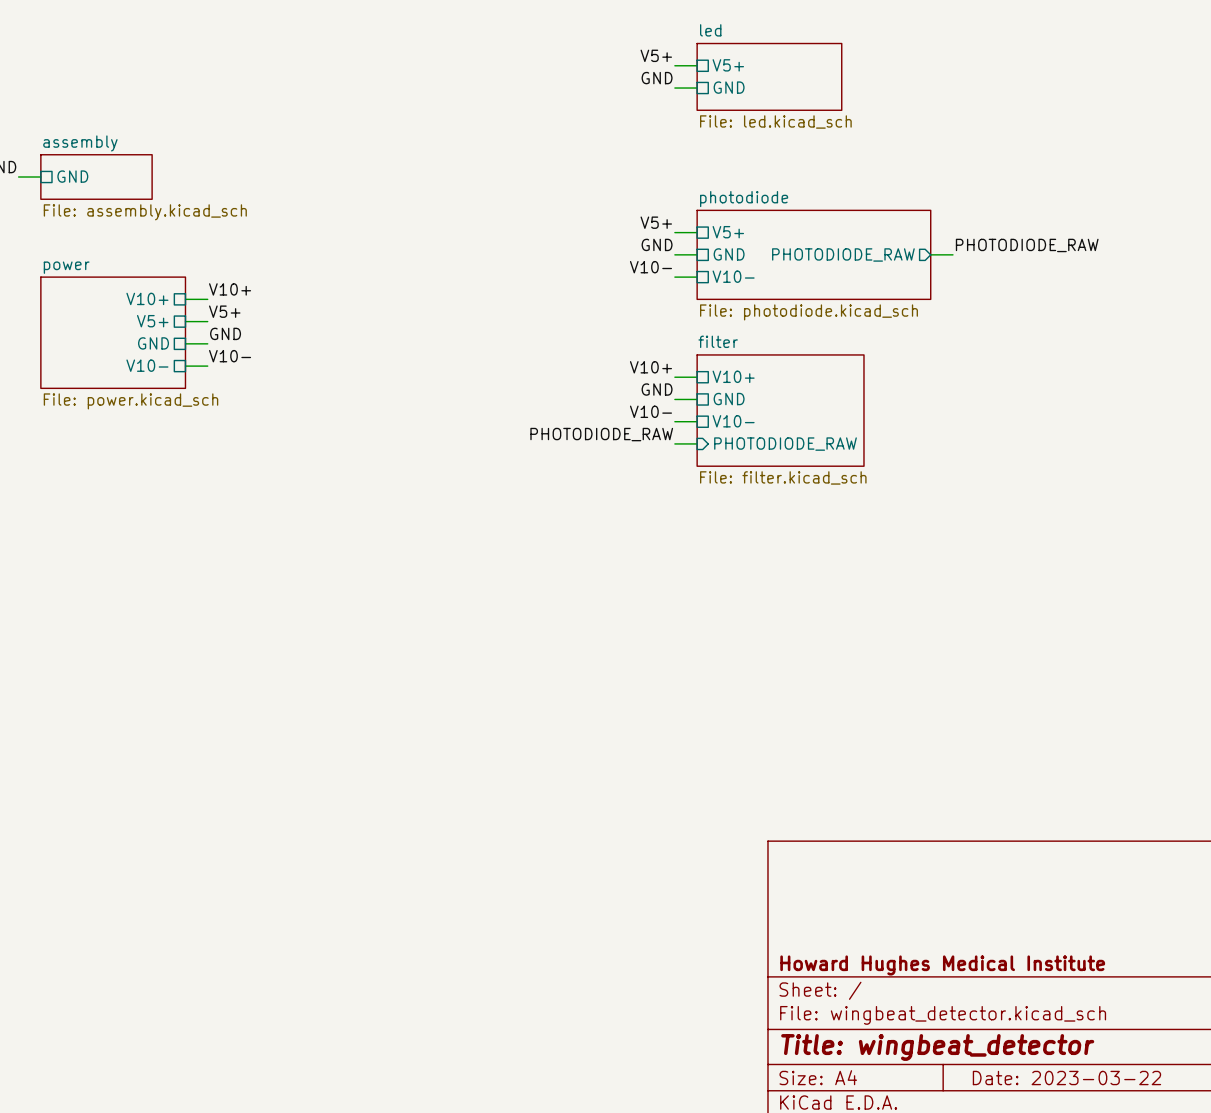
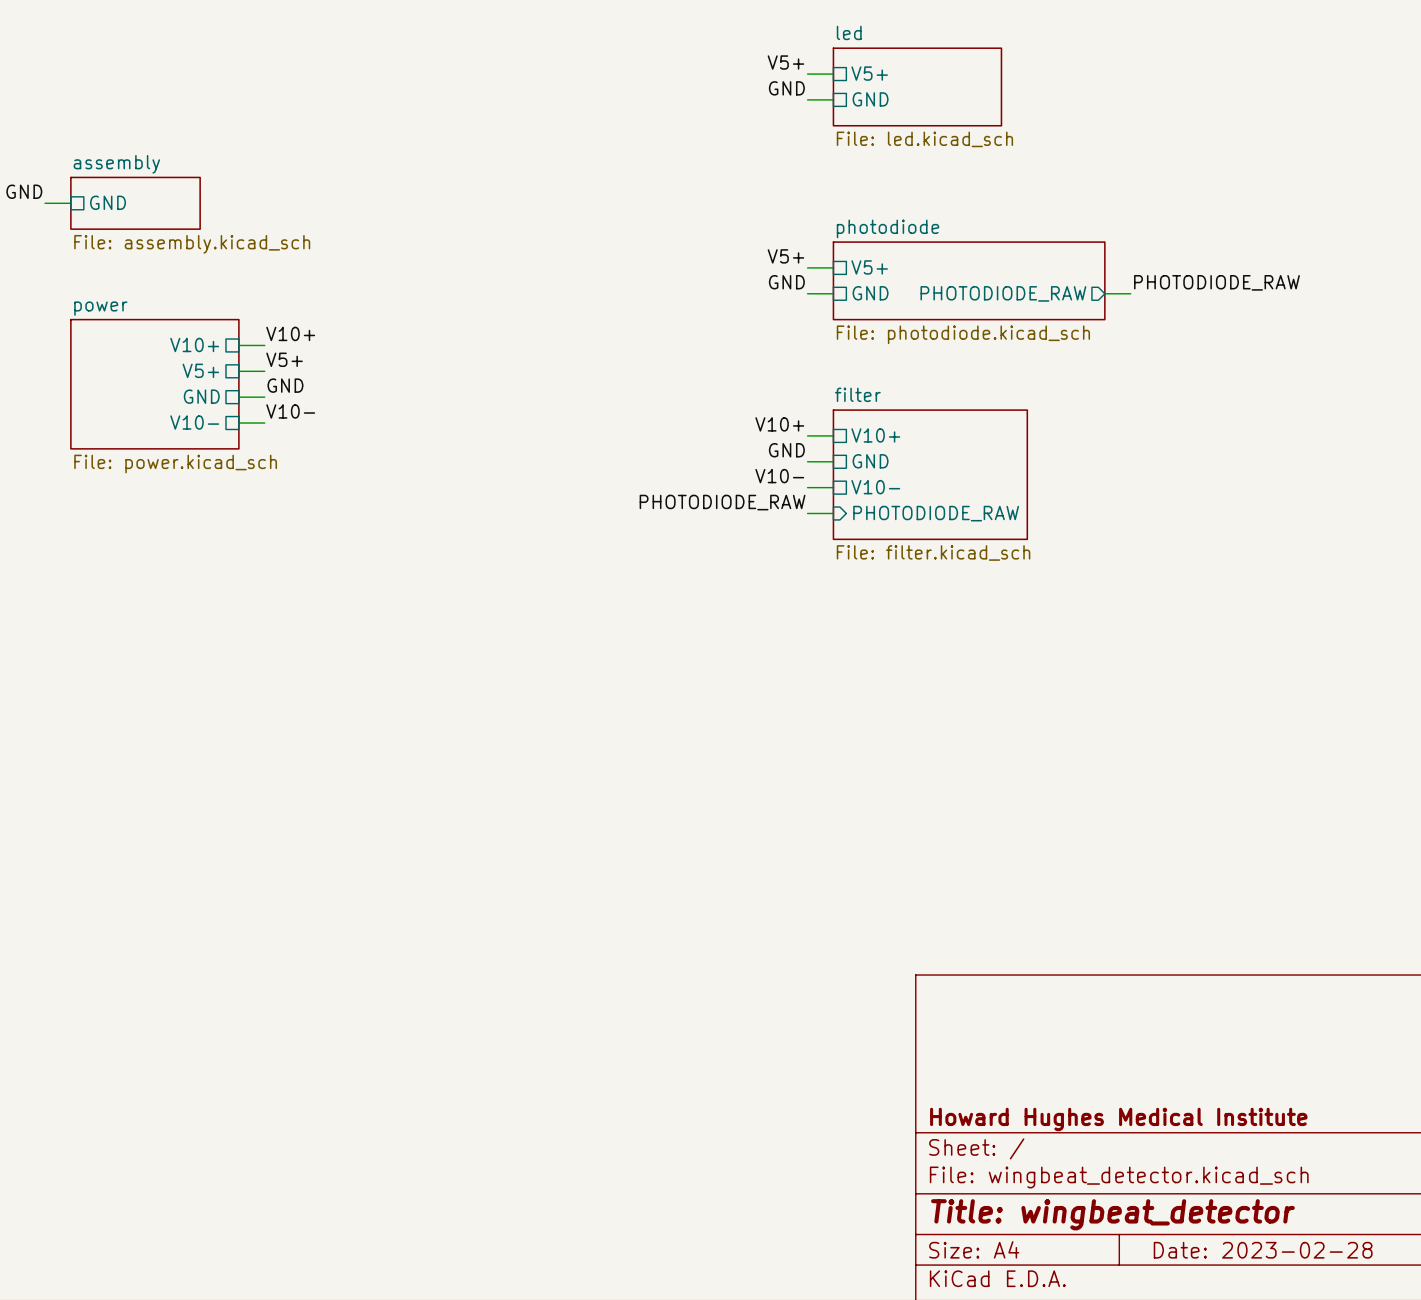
sheet photodiode: none -> File: photodiode.kicad_sch (969, 280)
sheet photodiode: File: photodiode.kicad_sch (813, 254) -> none
label: V10- (650, 267) -> none
sheet pin: V10- (733, 276) -> none
wire: (674, 277) (697, 277) -> none
title block: Date: 2023-03-22 (1066, 1078) -> Date: 2023-02-28 (1263, 1250)

